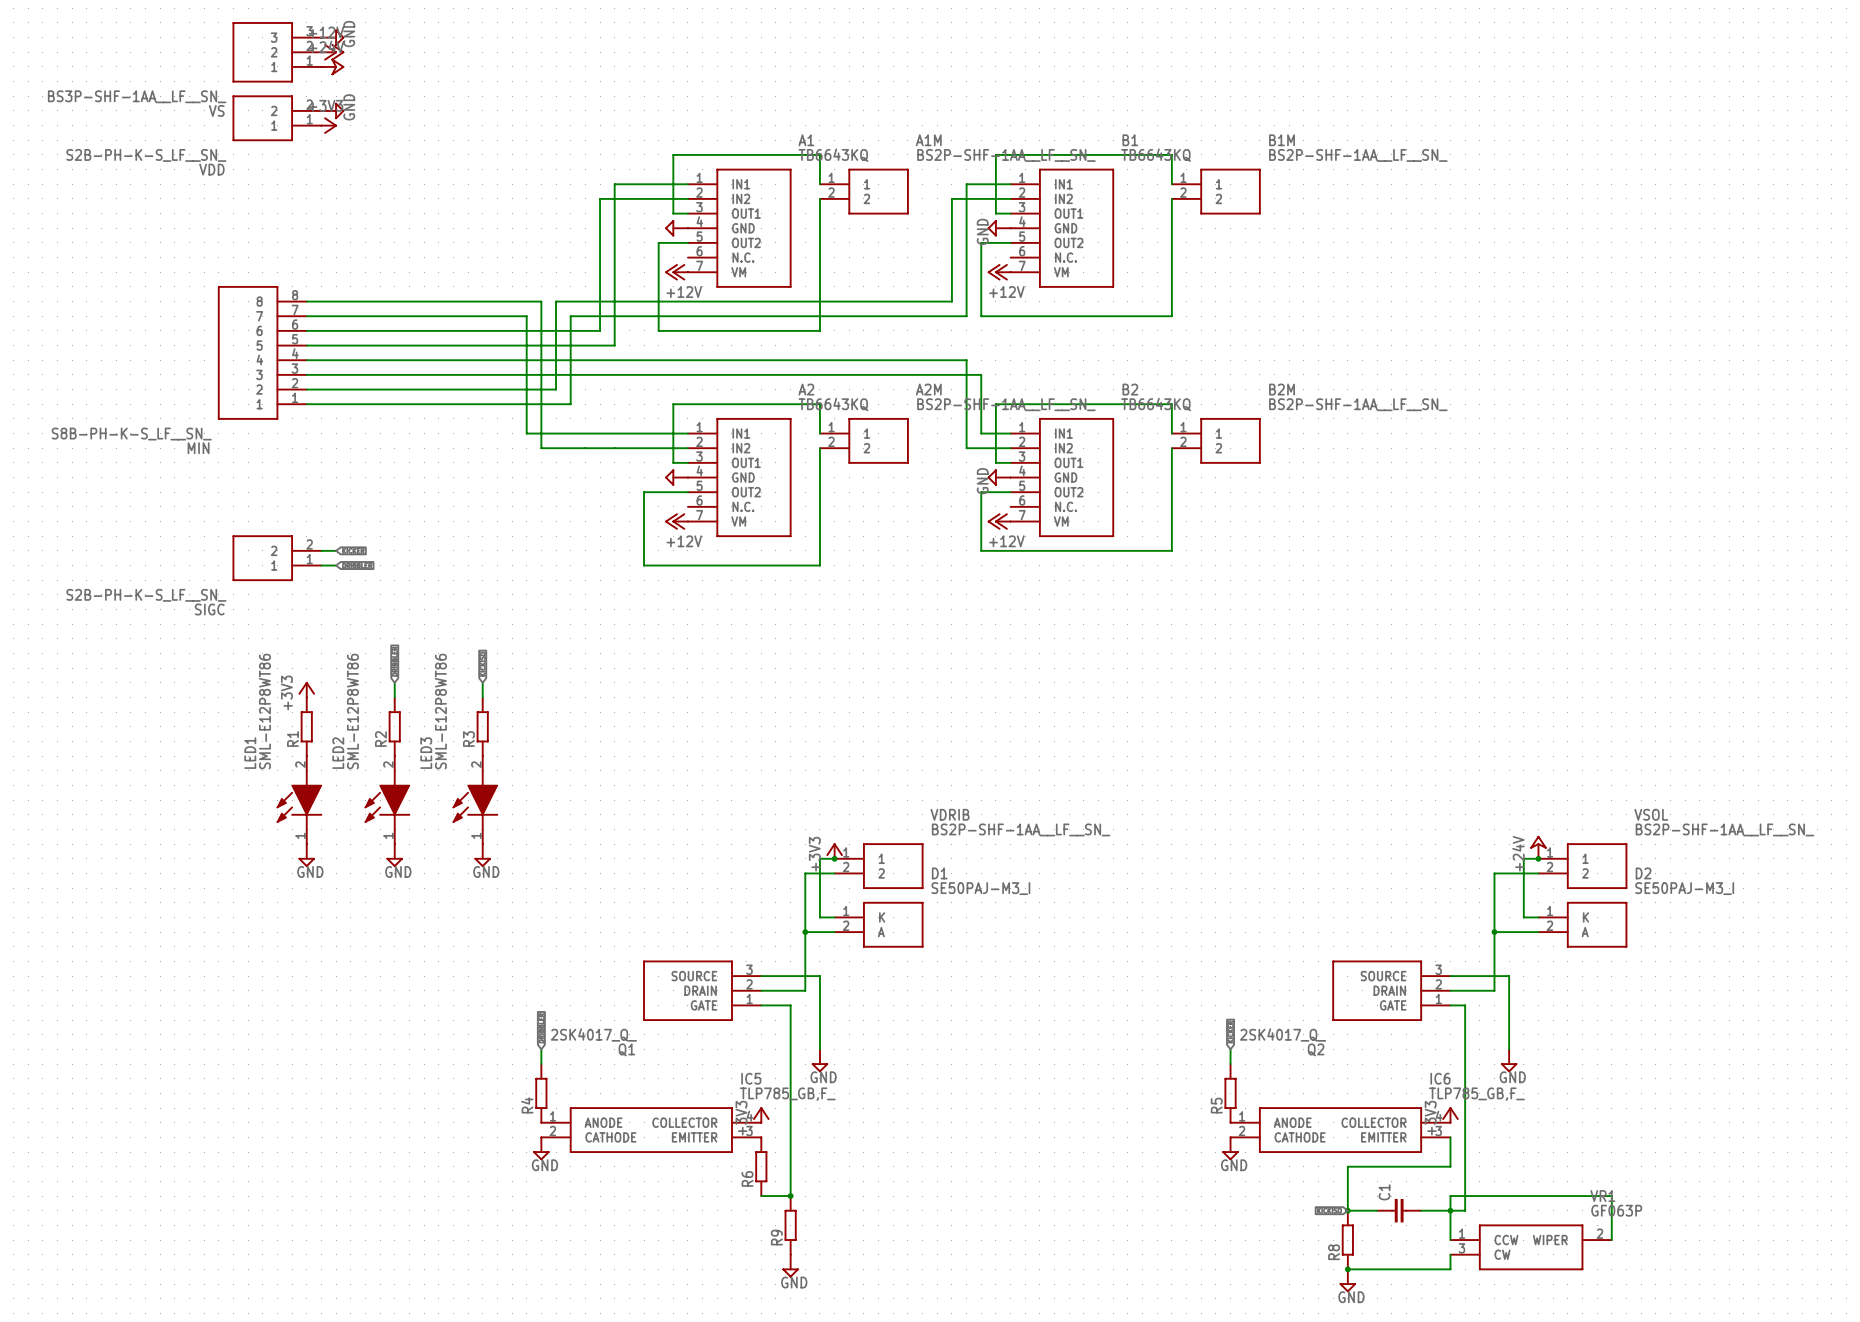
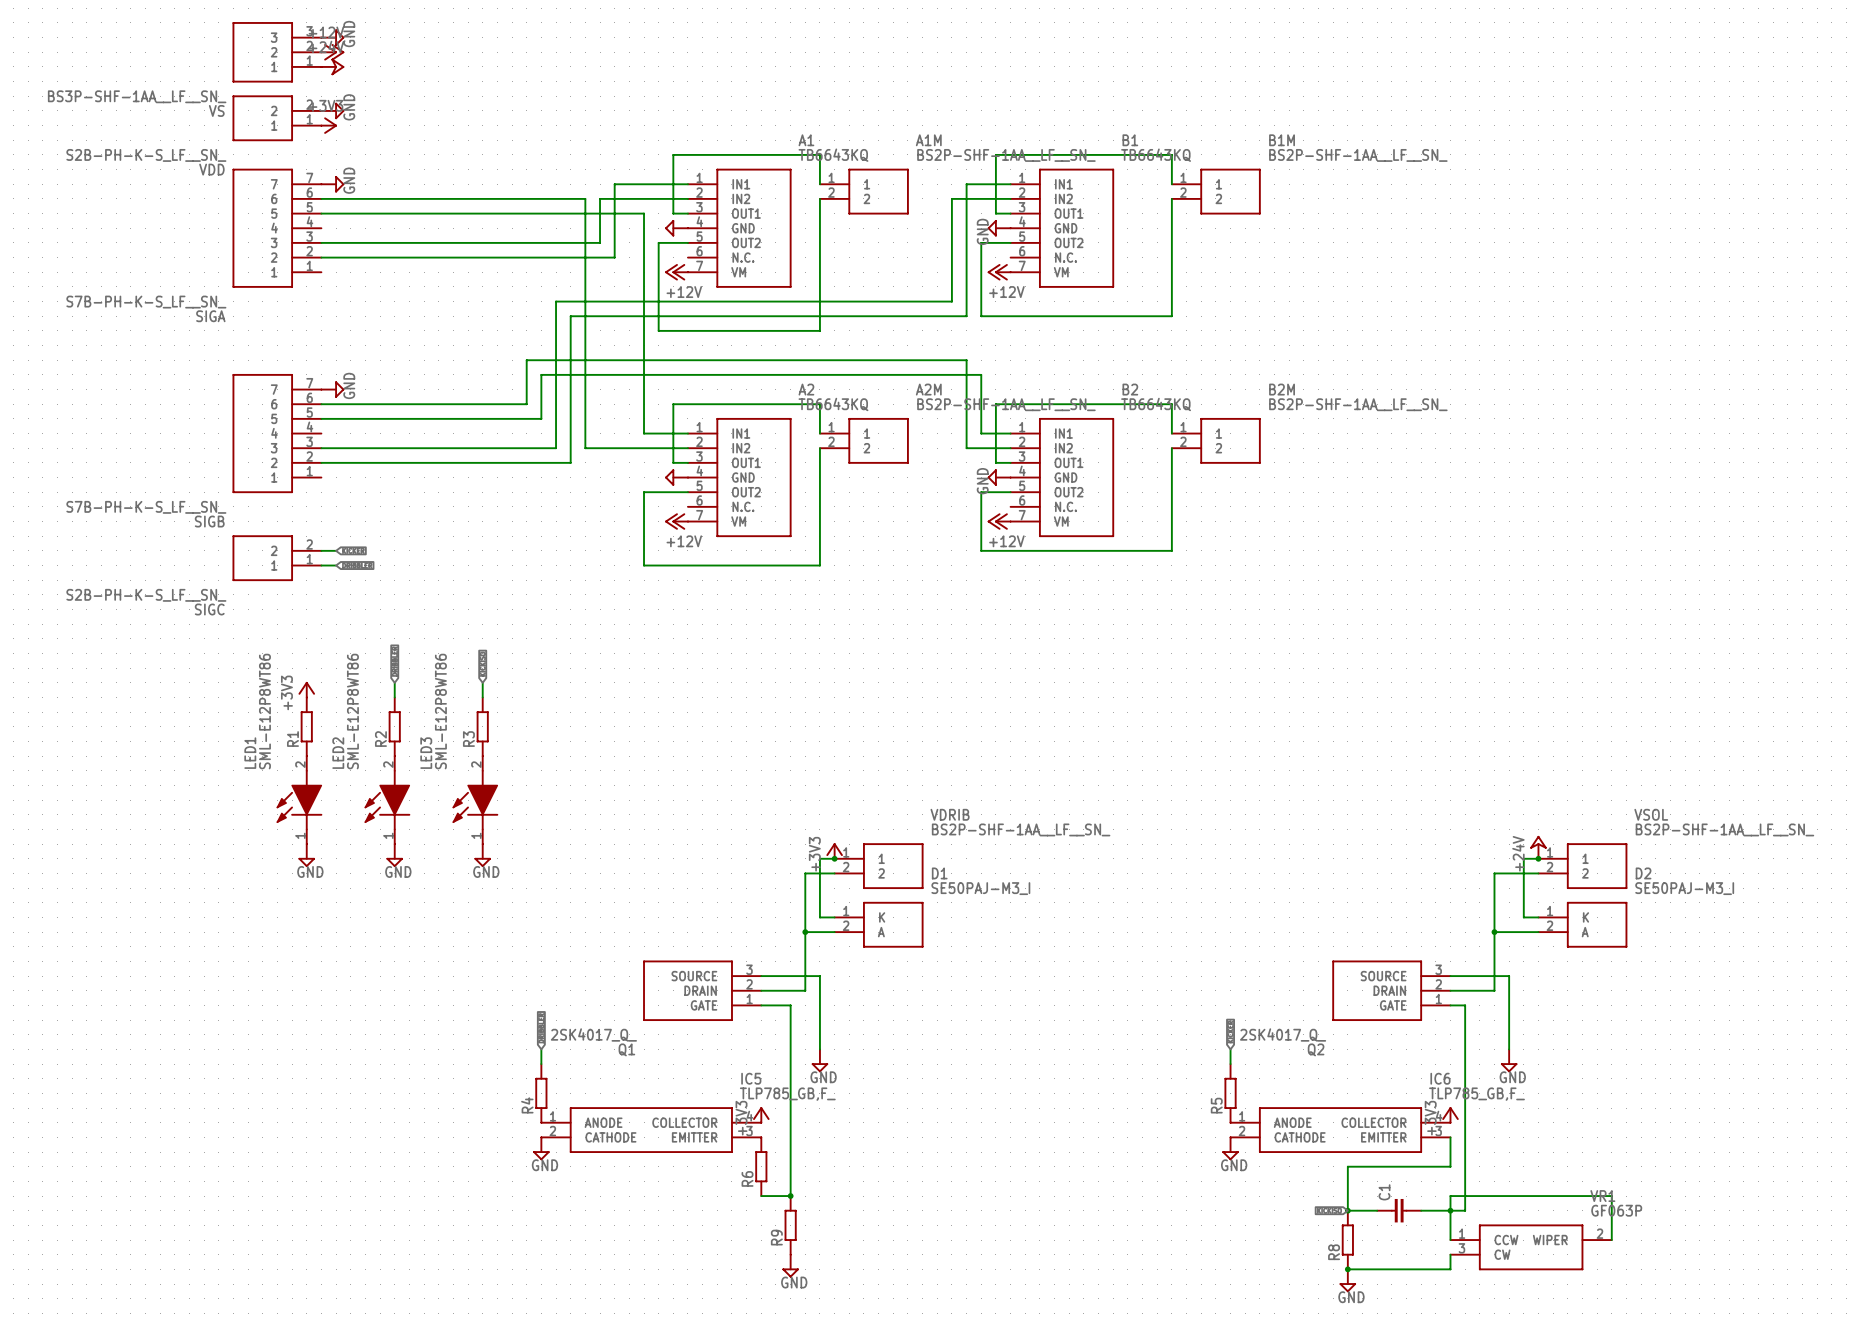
power symbol: none -> GND (332, 184)
wire: none -> (321, 198) (585, 198) (585, 448)
SIGA: none -> S7B-PH-K-S_LF__SN_ (277, 228)
wire: (600, 242) (600, 330) (306, 330) -> (600, 242) (321, 242)
wire: (614, 257) (614, 345) (306, 345) -> (614, 257) (321, 257)
wire: (306, 301) (541, 301) (541, 374) (306, 374) -> none
wire: (306, 316) (526, 316) (526, 360) (306, 360) -> none
MIN: S8B-PH-K-S_LF__SN_ (262, 352) -> none
wire: (306, 389) (556, 389) -> none
power symbol: none -> GND (332, 389)
wire: (570, 404) (526, 404) (526, 433) (644, 433) -> (321, 213) (644, 213) (644, 433)
wire: none -> (570, 404) (570, 462) (321, 462)
wire: (541, 418) (541, 448) -> (541, 418) (321, 418)
SIGB: none -> S7B-PH-K-S_LF__SN_ (277, 433)
wire: none -> (321, 448) (541, 448)
wire: (556, 448) (585, 448) -> (556, 448) (556, 389)

